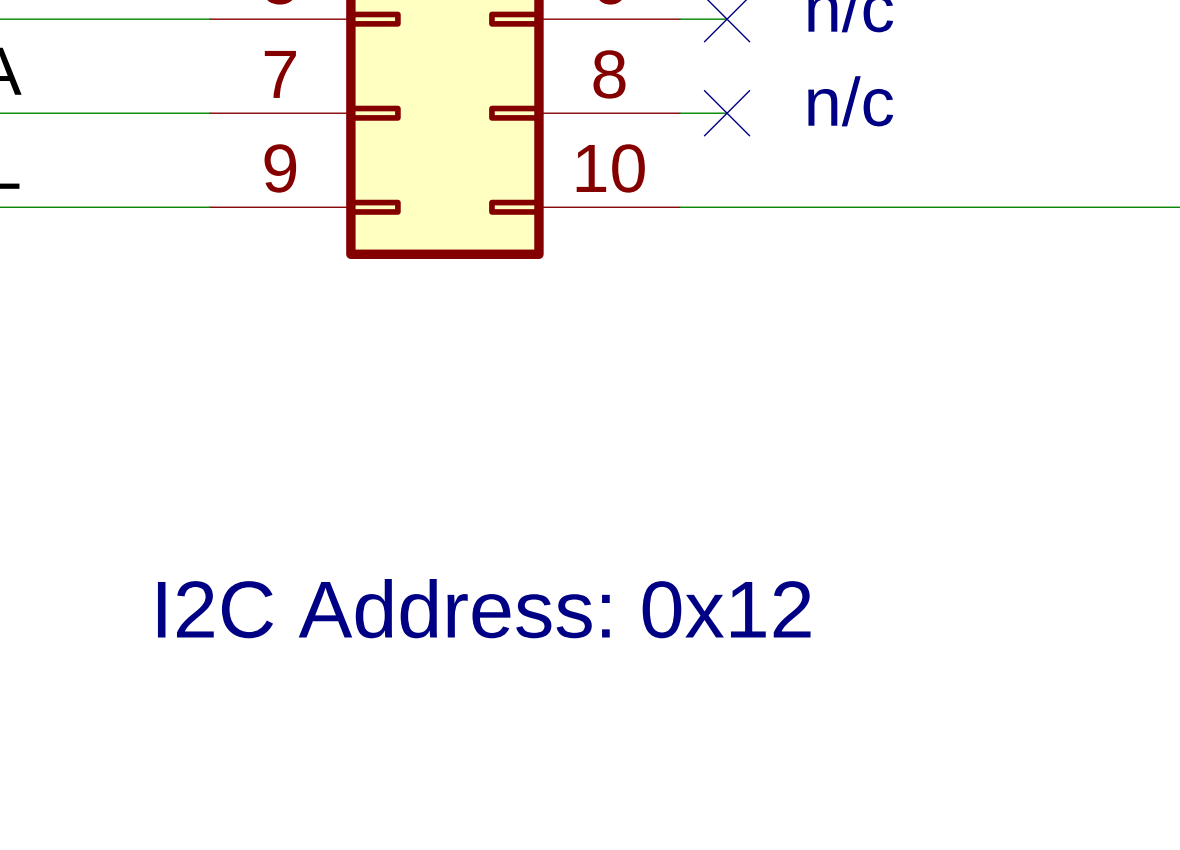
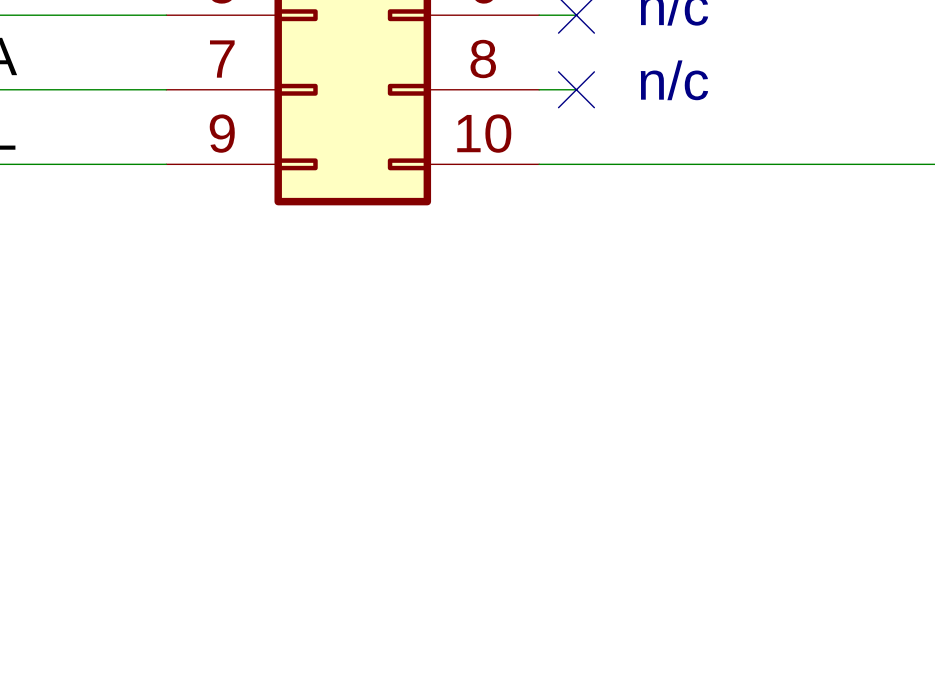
text: I2C Address: 0x12 (484, 608) -> none

